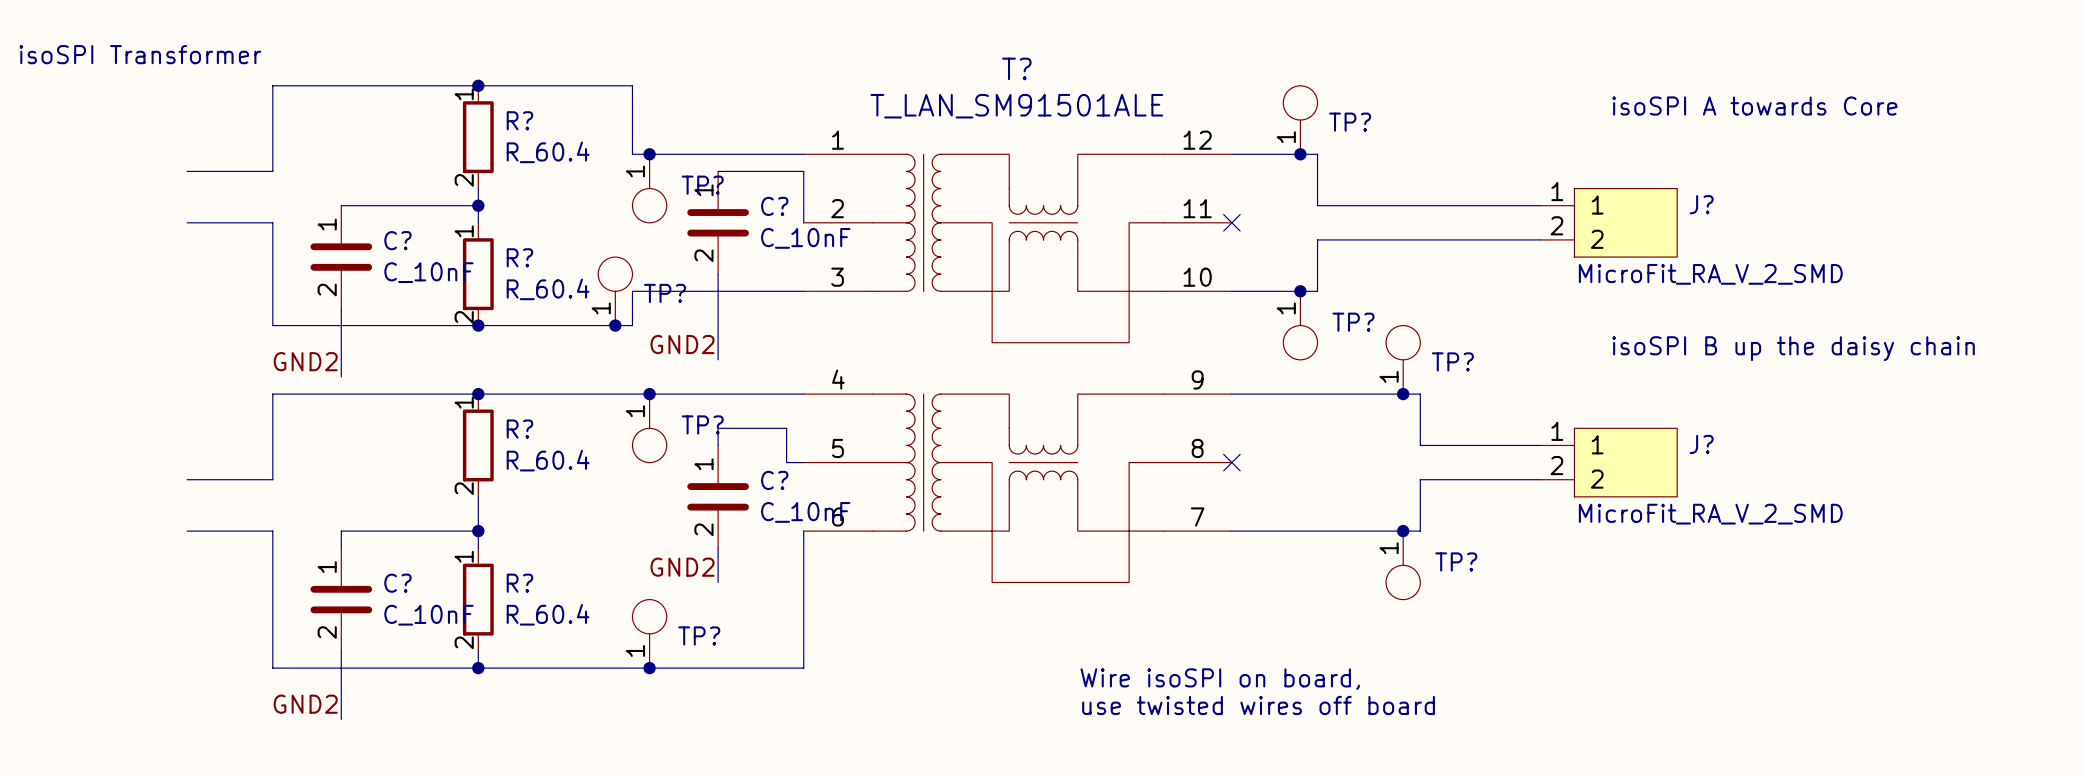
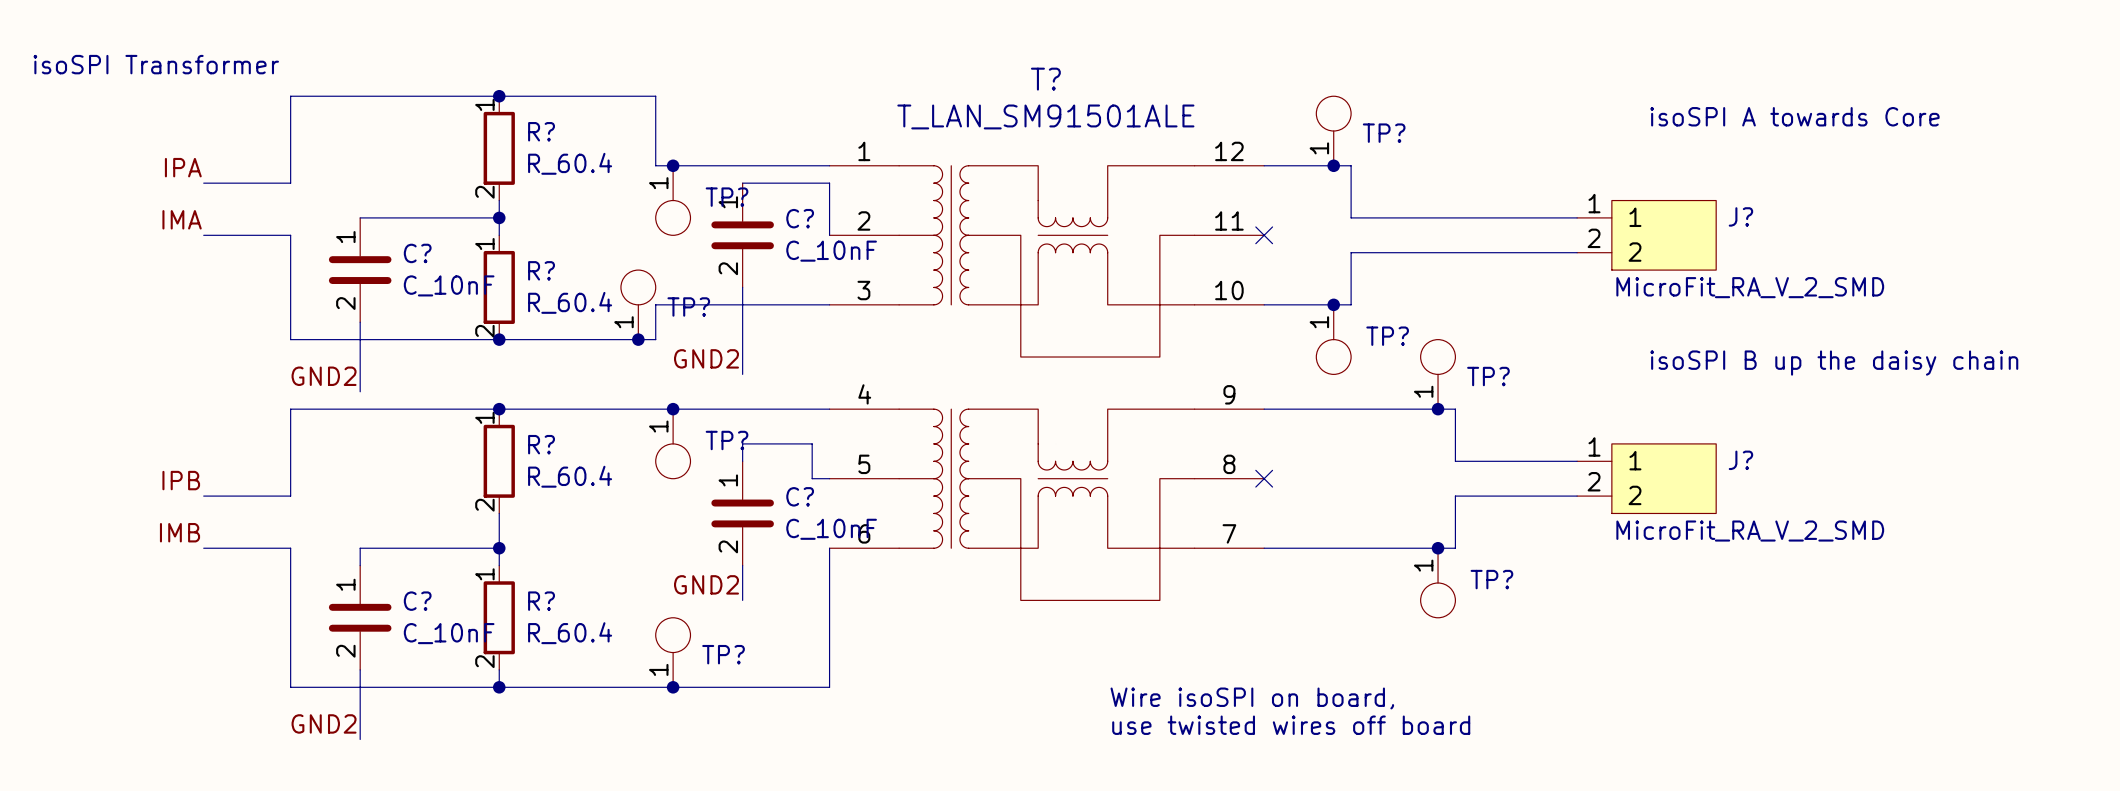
label: none -> IPA (183, 167)
label: none -> IMA (182, 219)
label: none -> IPB (181, 480)
label: none -> IMB (180, 532)

